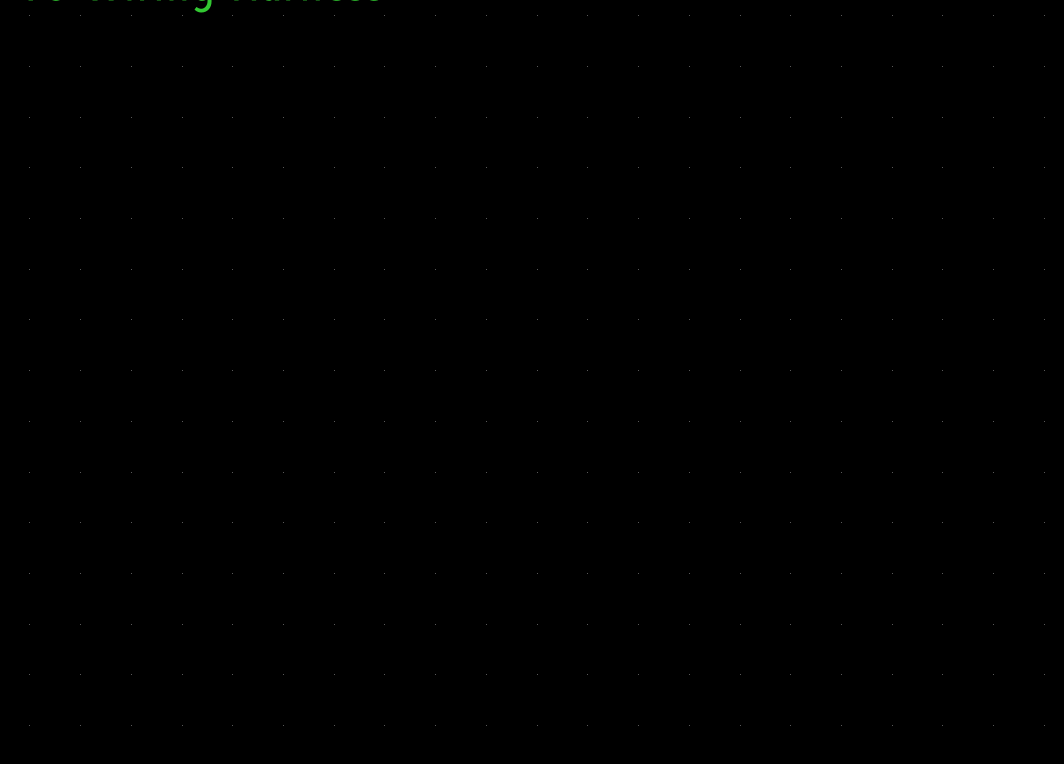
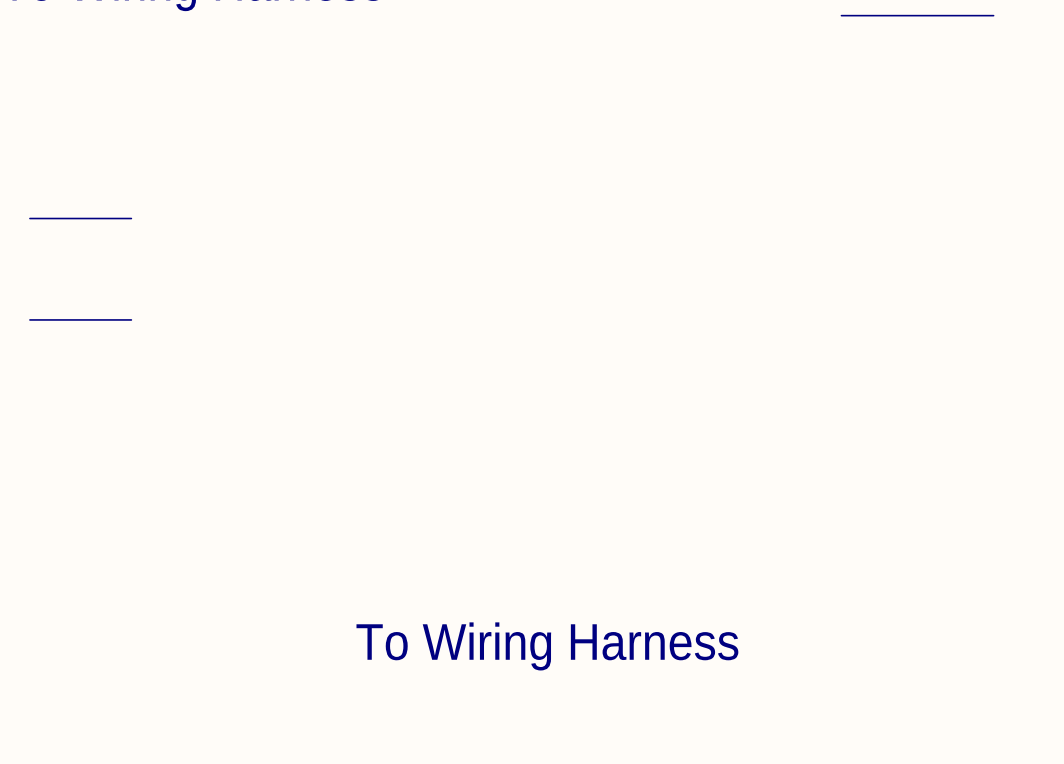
wire: none -> (841, 15) (993, 15)
wire: none -> (29, 218) (131, 218)
wire: none -> (29, 319) (131, 319)
text: none -> To Wiring Harness (547, 646)

